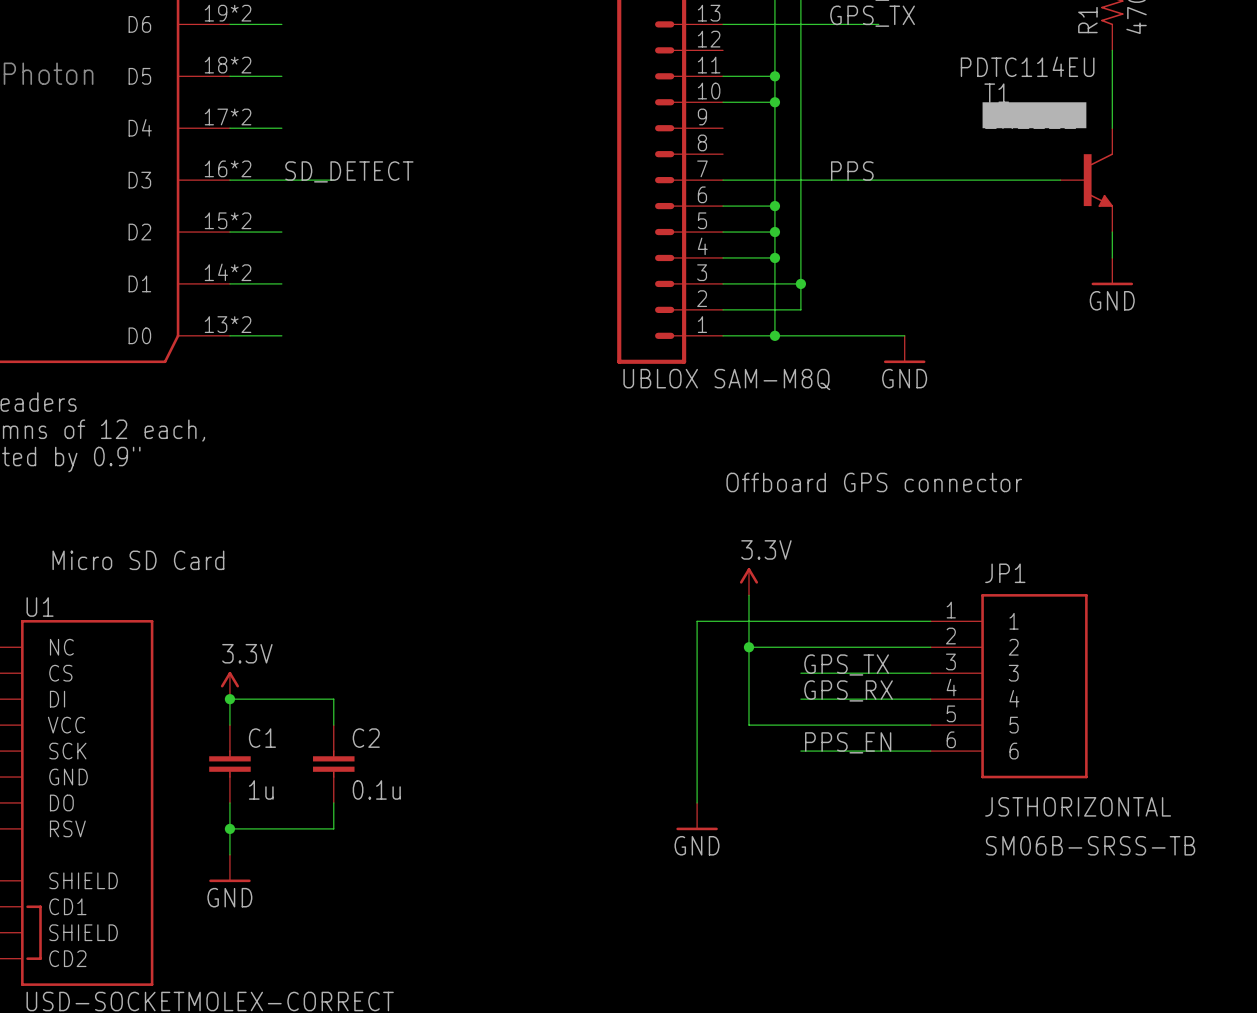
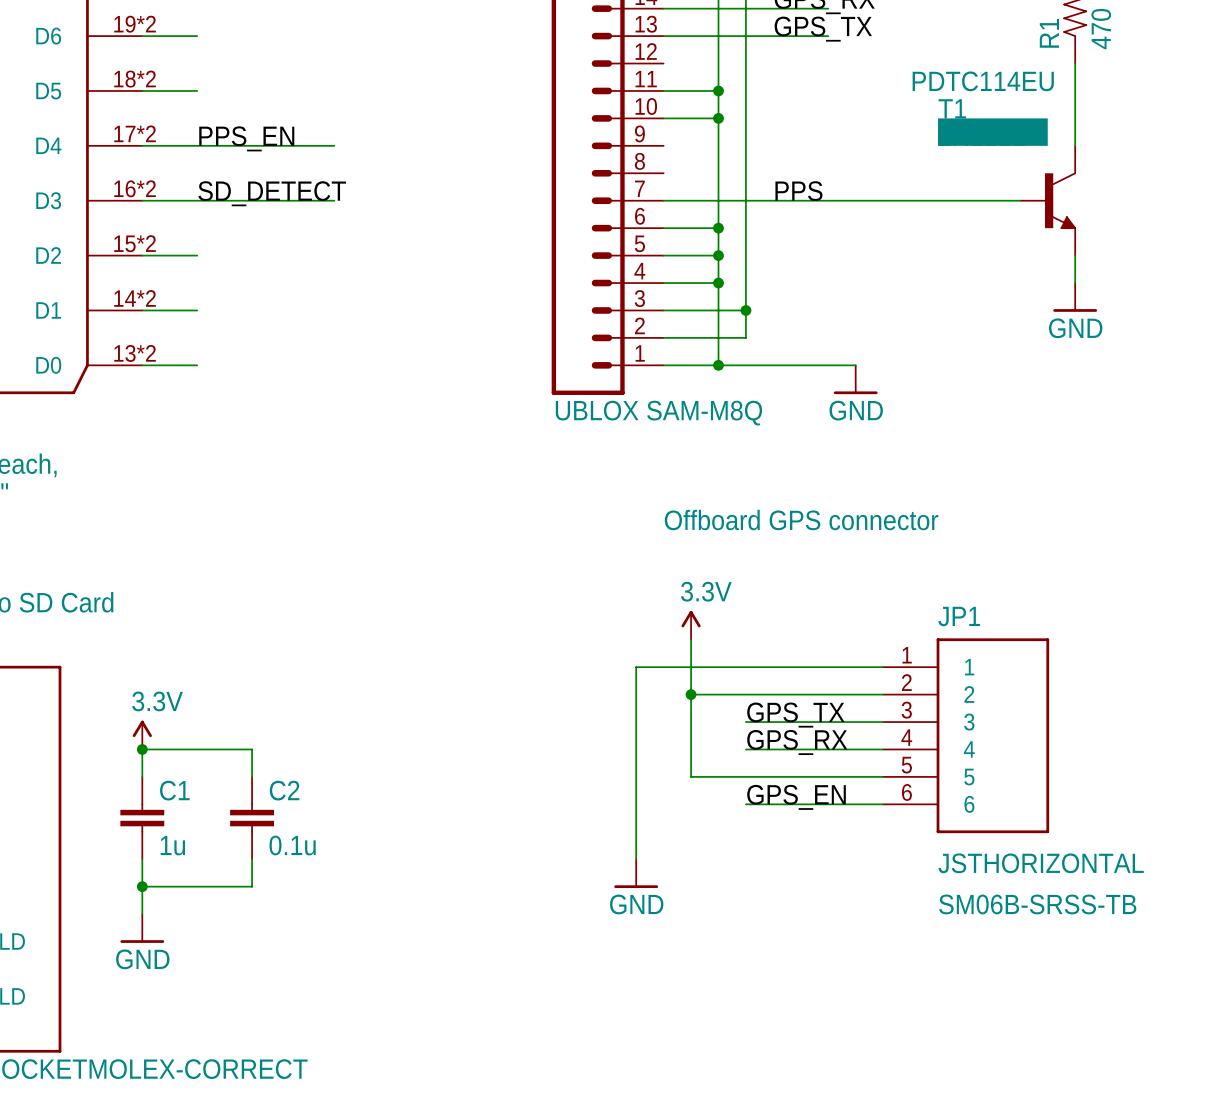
label: none -> PPS_EN (246, 138)
wire: none -> (197, 145) (334, 145)
wire: none -> (252, 200) (334, 200)
label: PPS_EN (848, 742) -> GPS_EN (796, 797)

